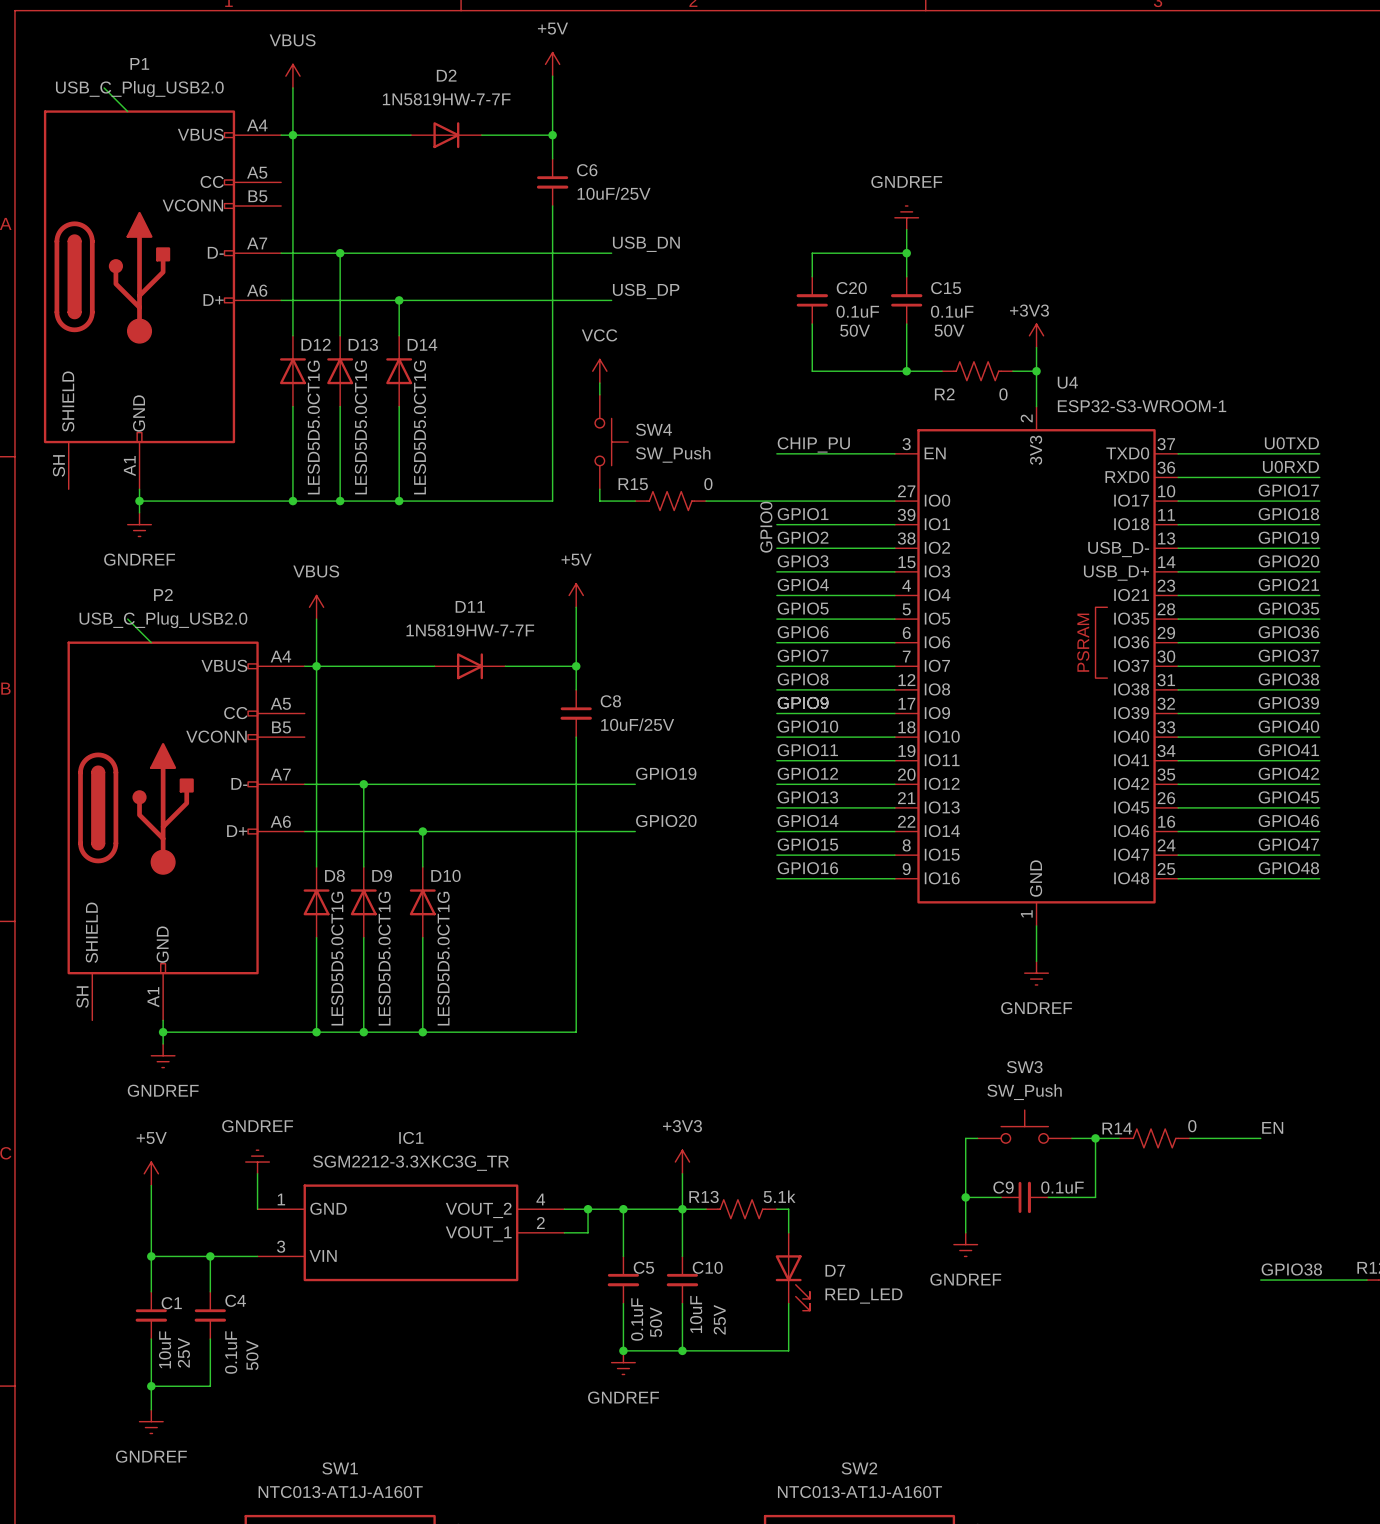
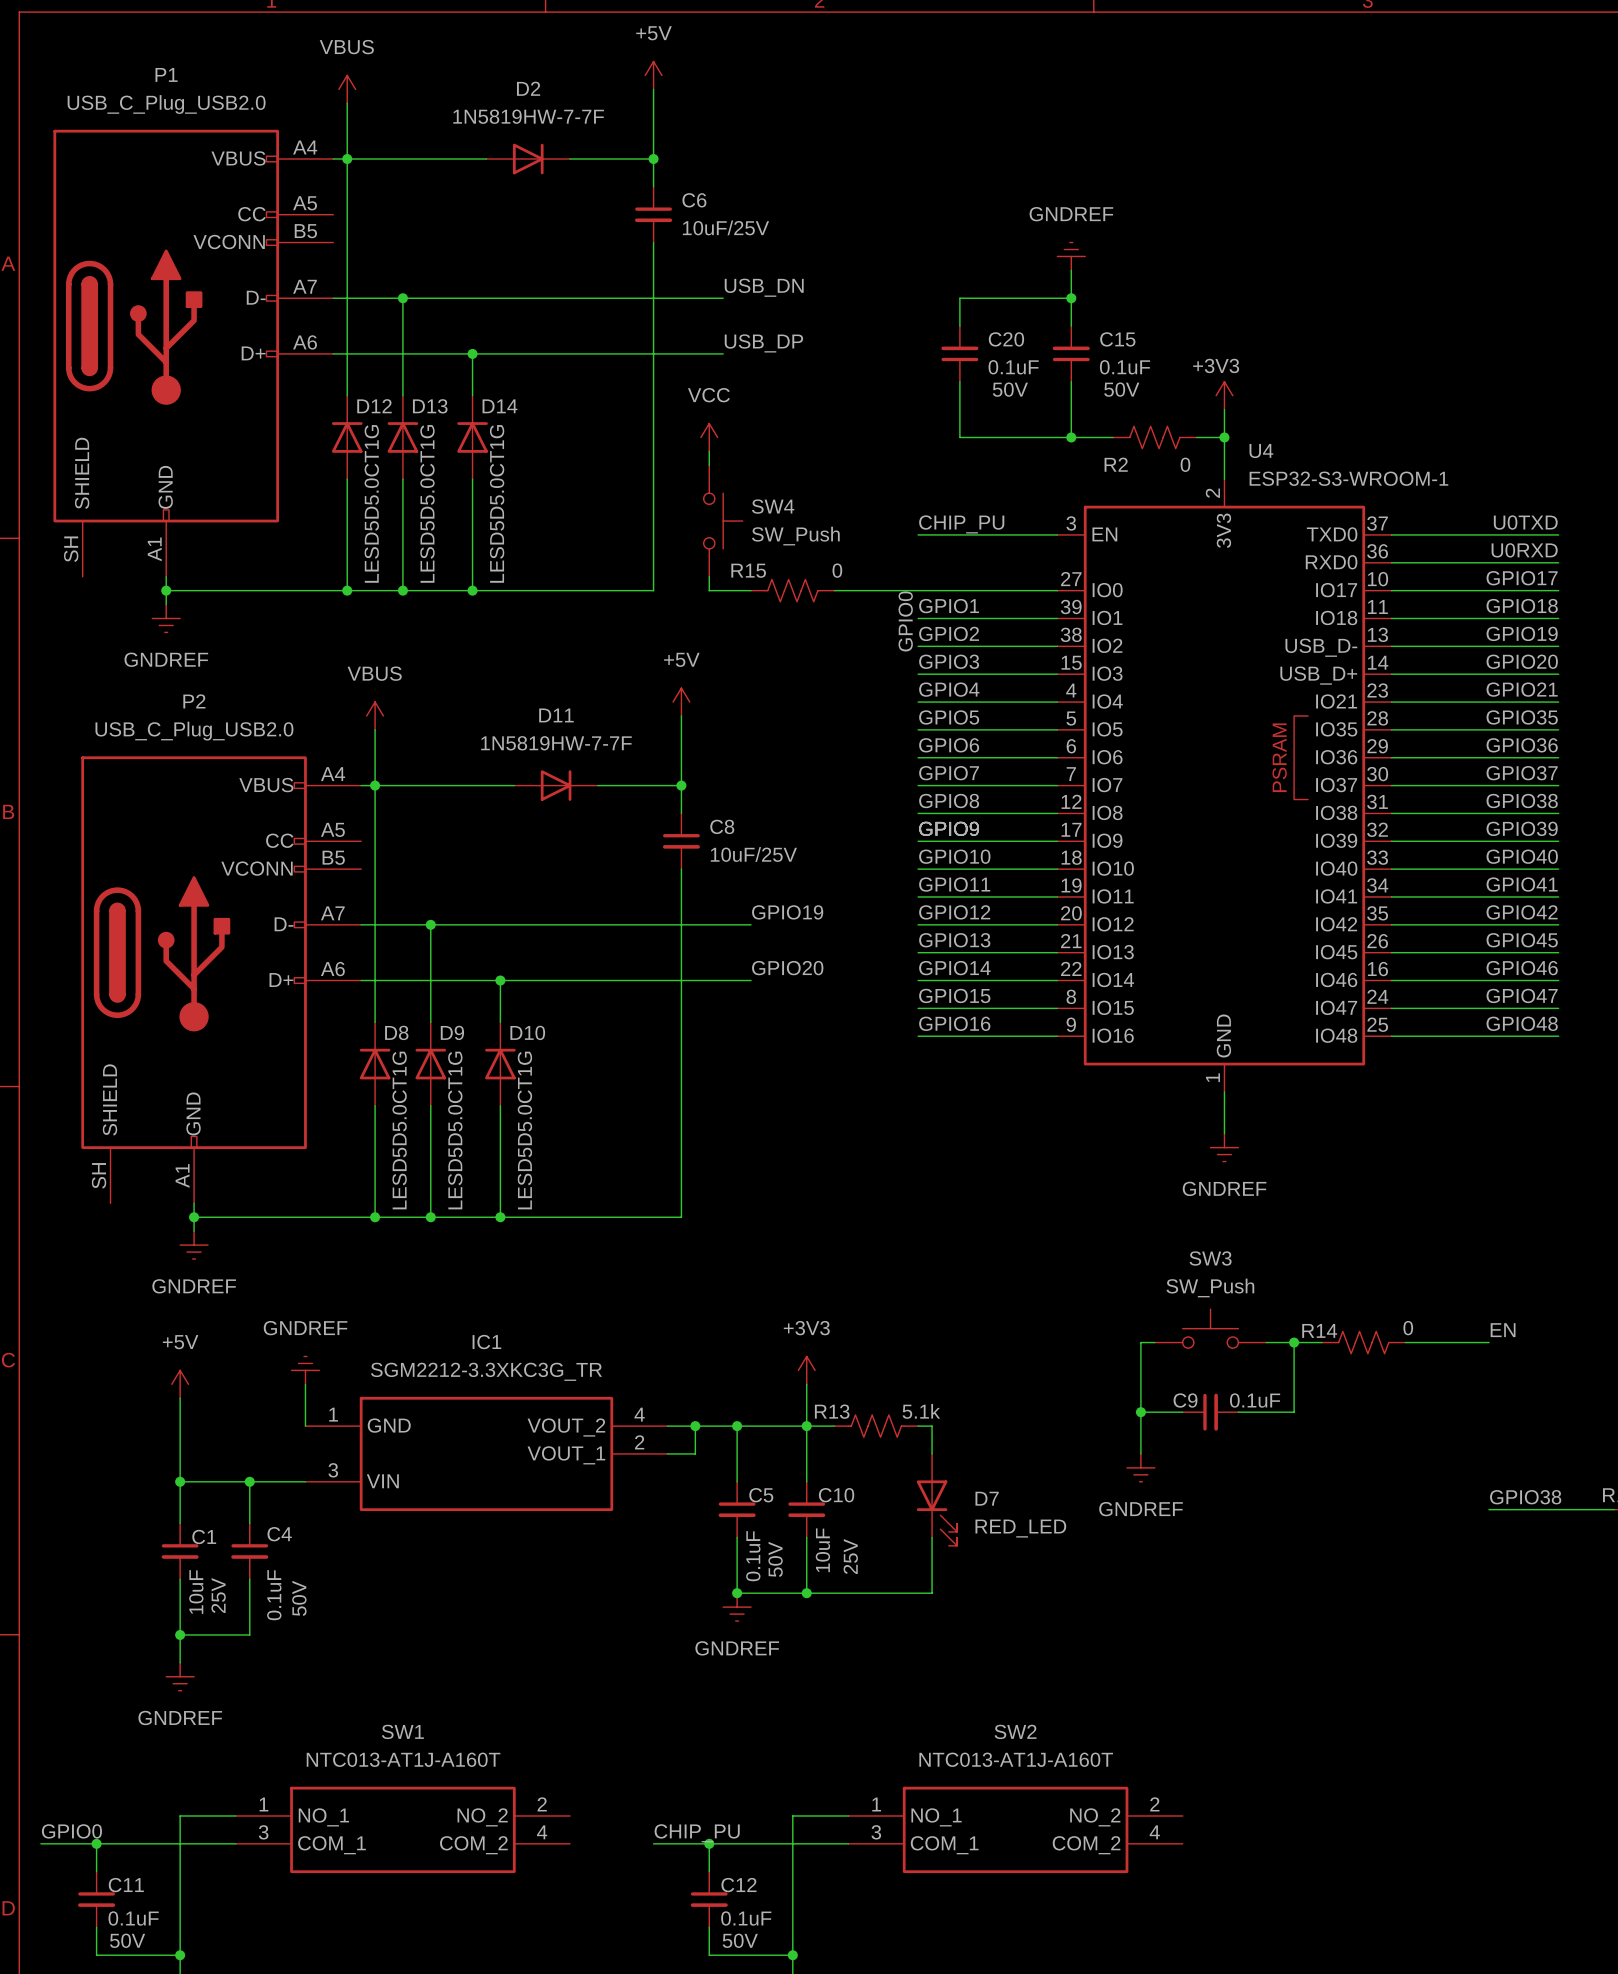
wire: (104, 87) (127, 111) -> none
wire: (127, 619) (151, 642) -> none

